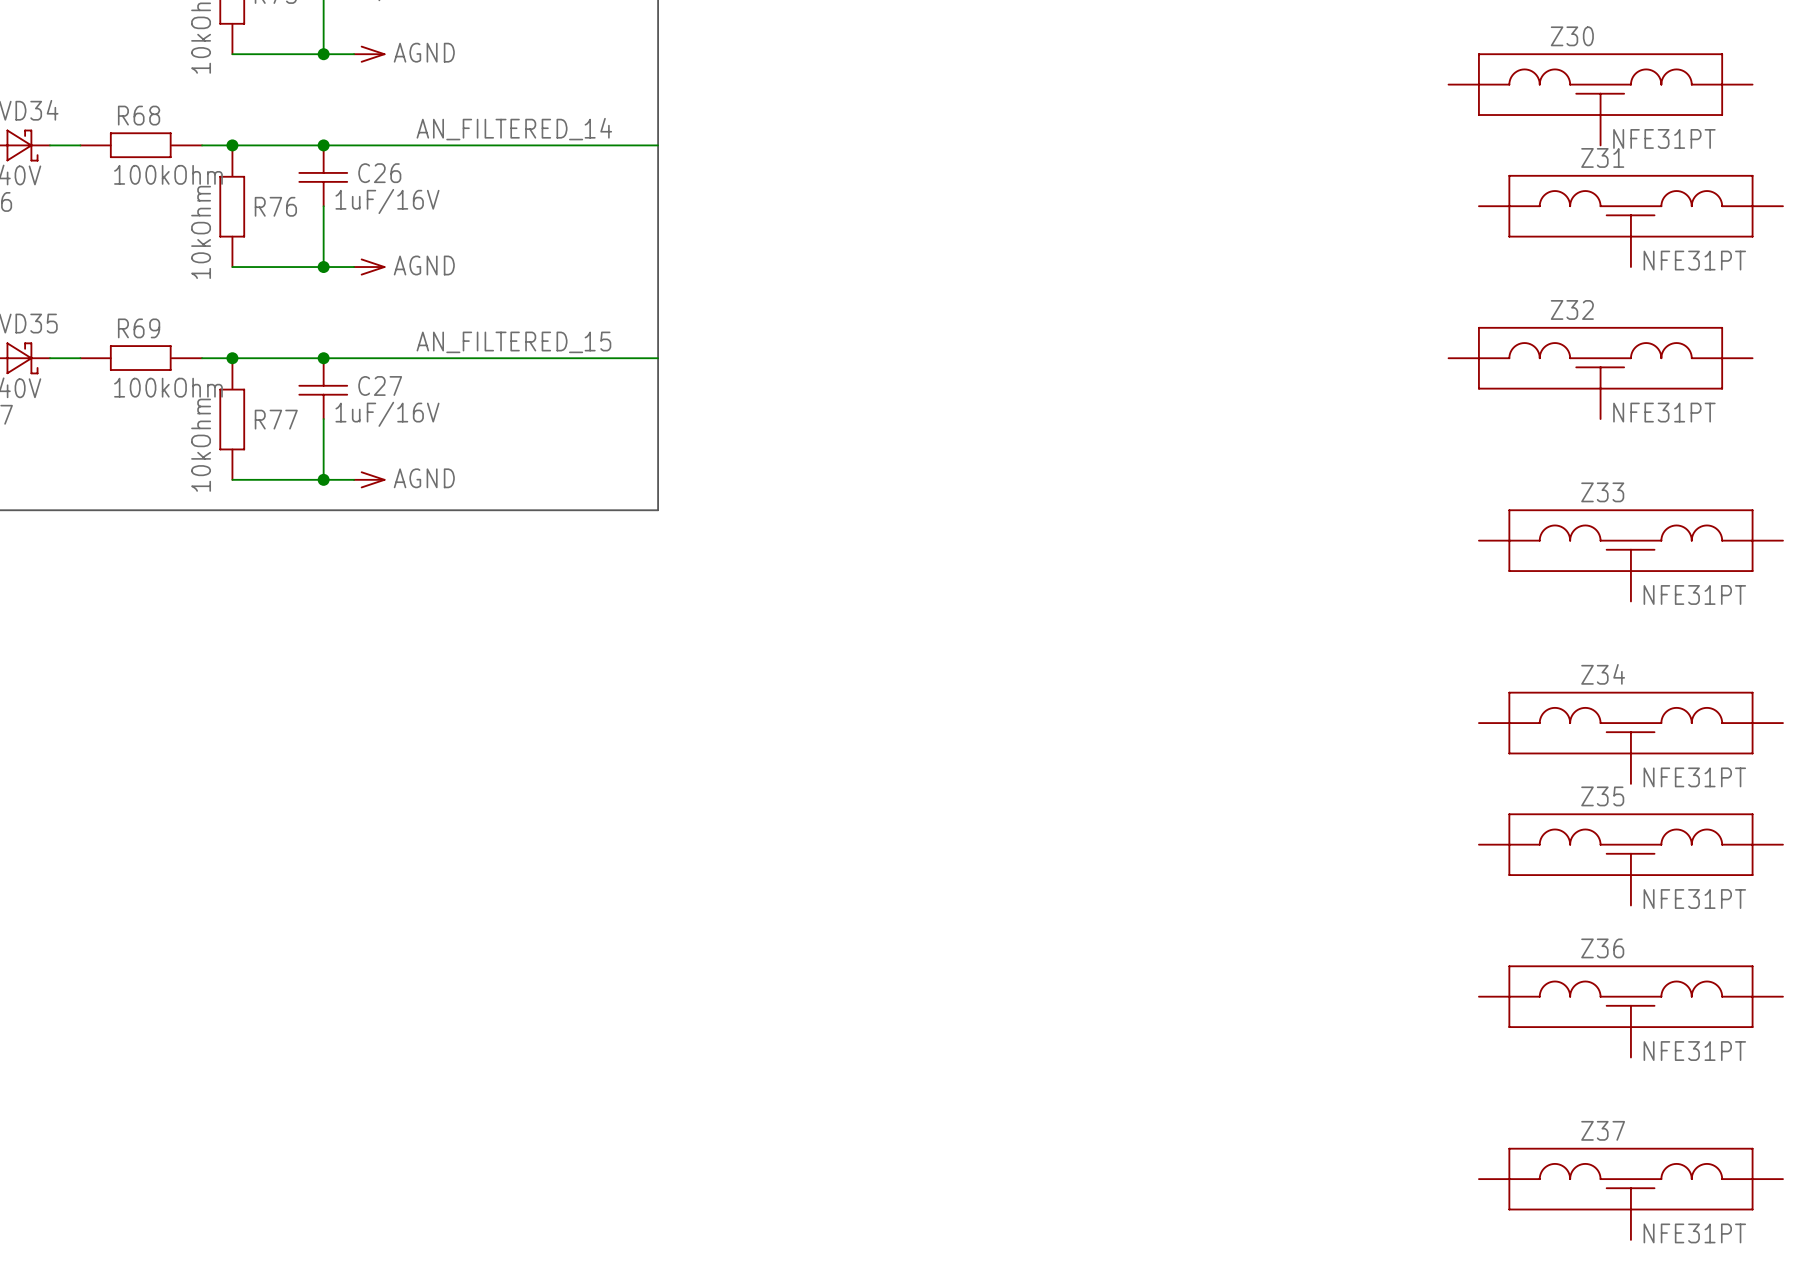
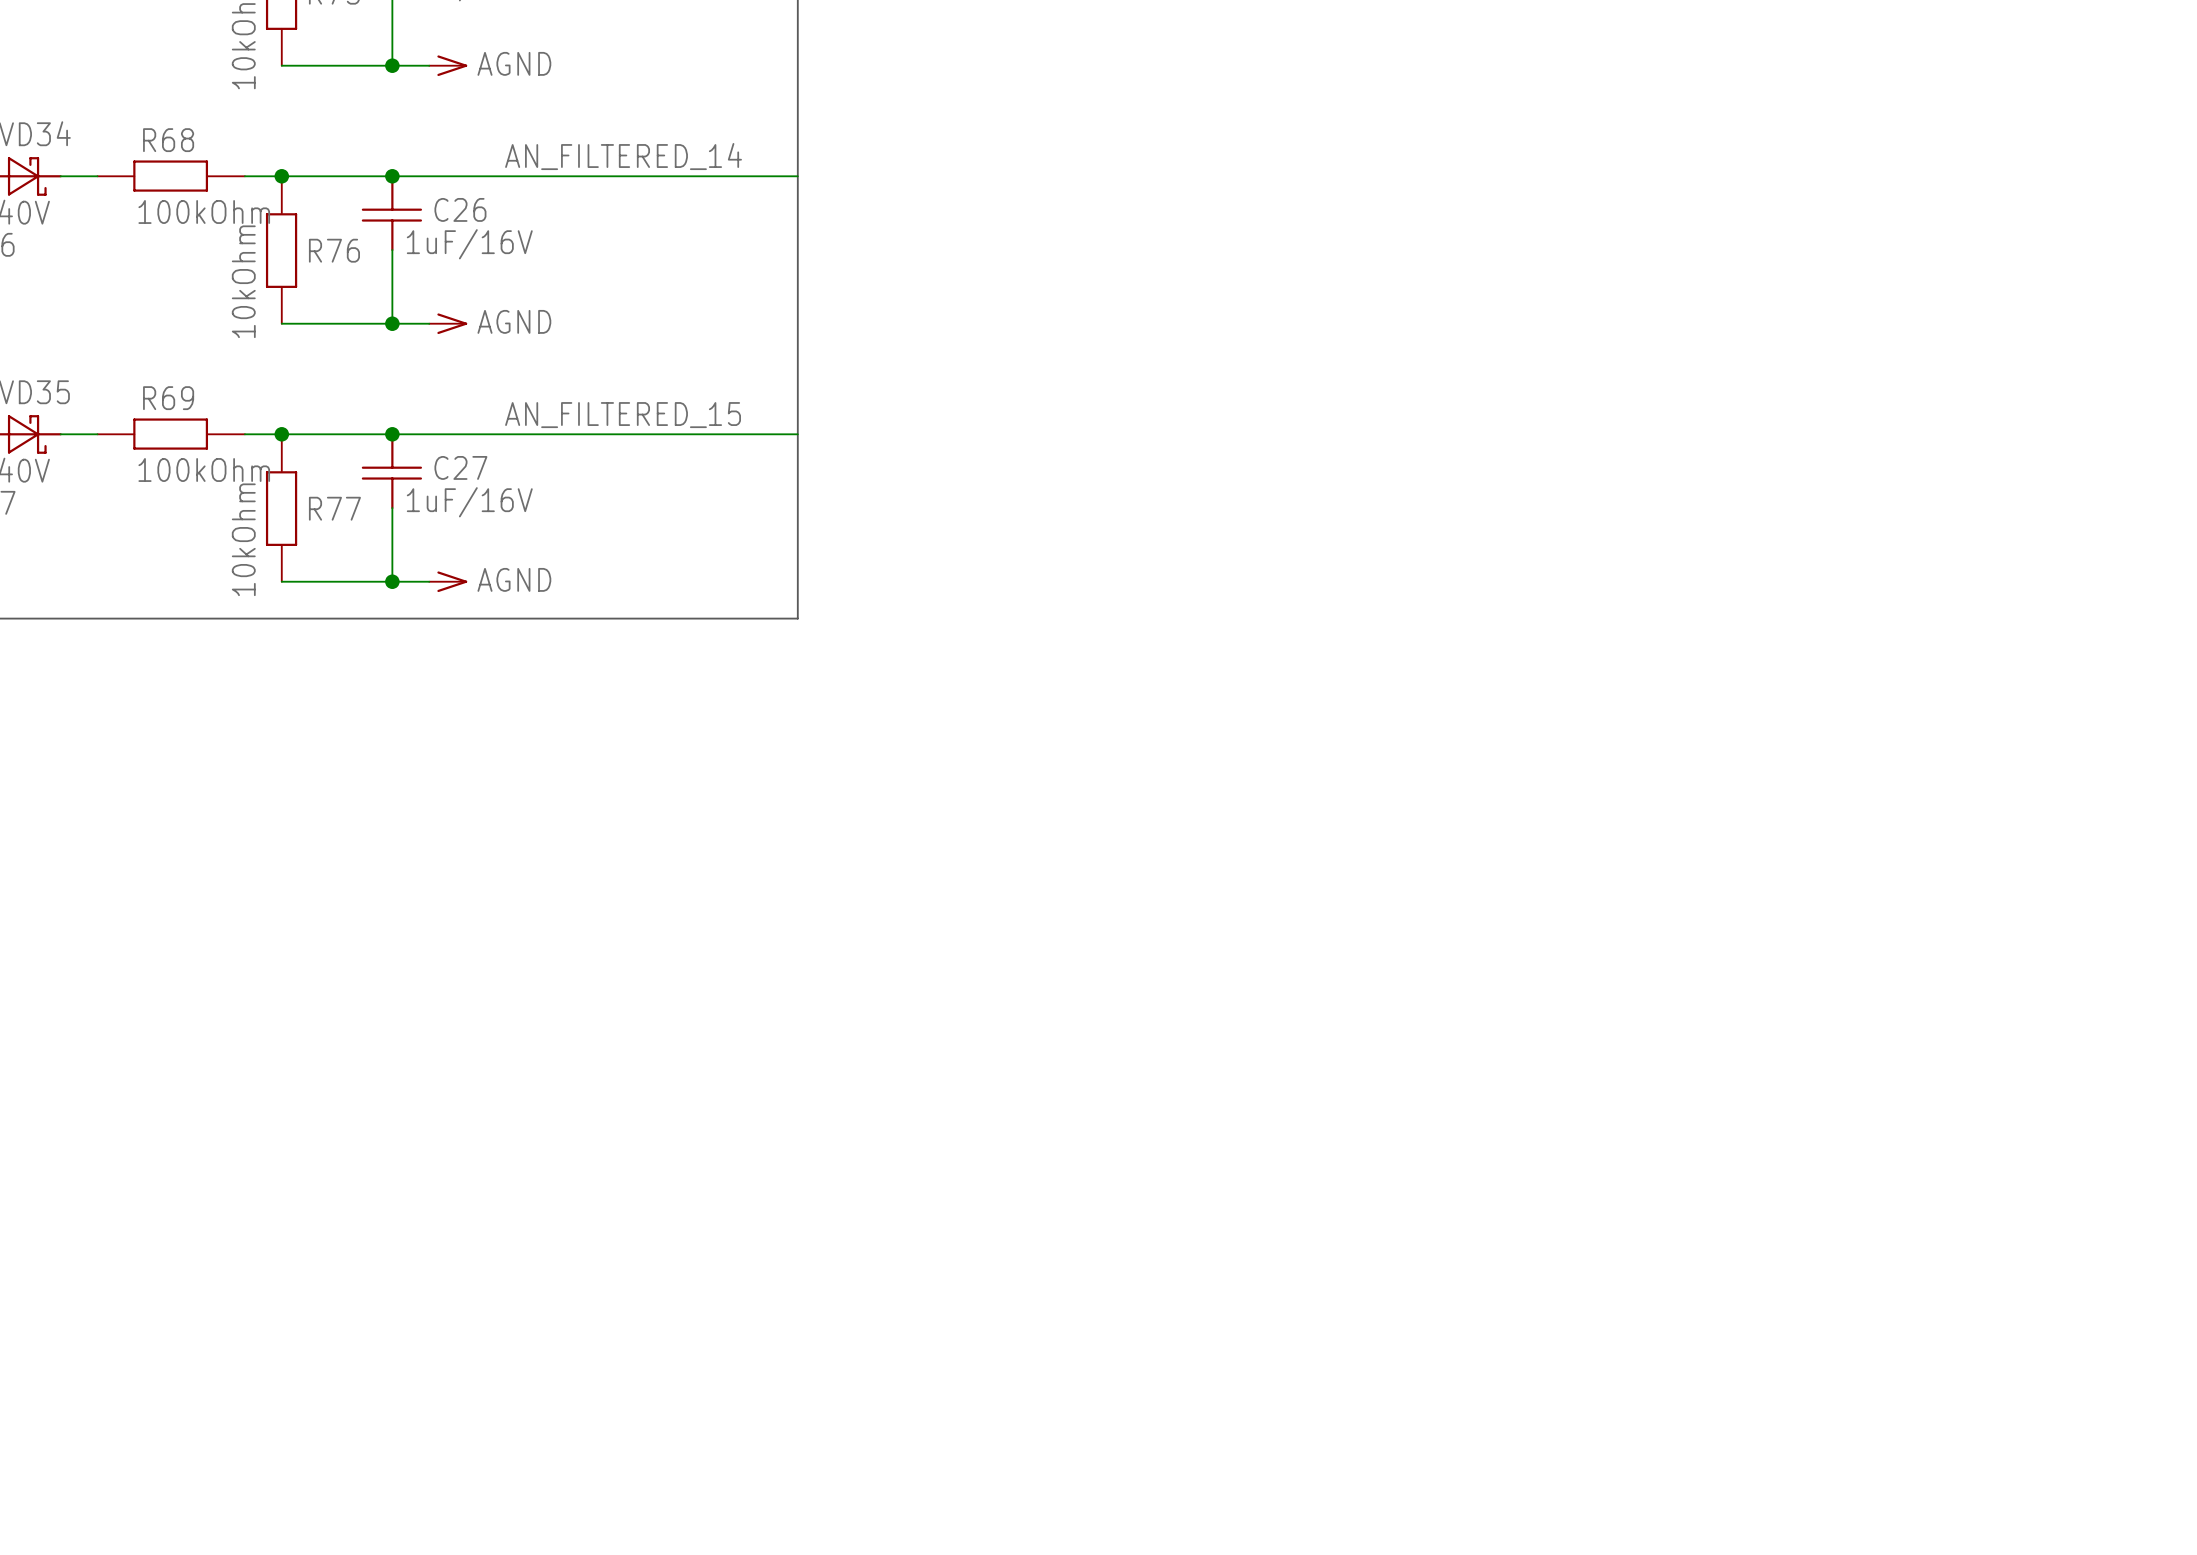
Z30: NFE31PT (1600, 99) -> none
Z31: NFE31PT (1630, 220) -> none
Z32: NFE31PT (1600, 372) -> none
Z33: NFE31PT (1630, 555) -> none
Z34: NFE31PT (1630, 737) -> none
Z35: NFE31PT (1630, 859) -> none
Z36: NFE31PT (1630, 1011) -> none
Z37: NFE31PT (1630, 1193) -> none

